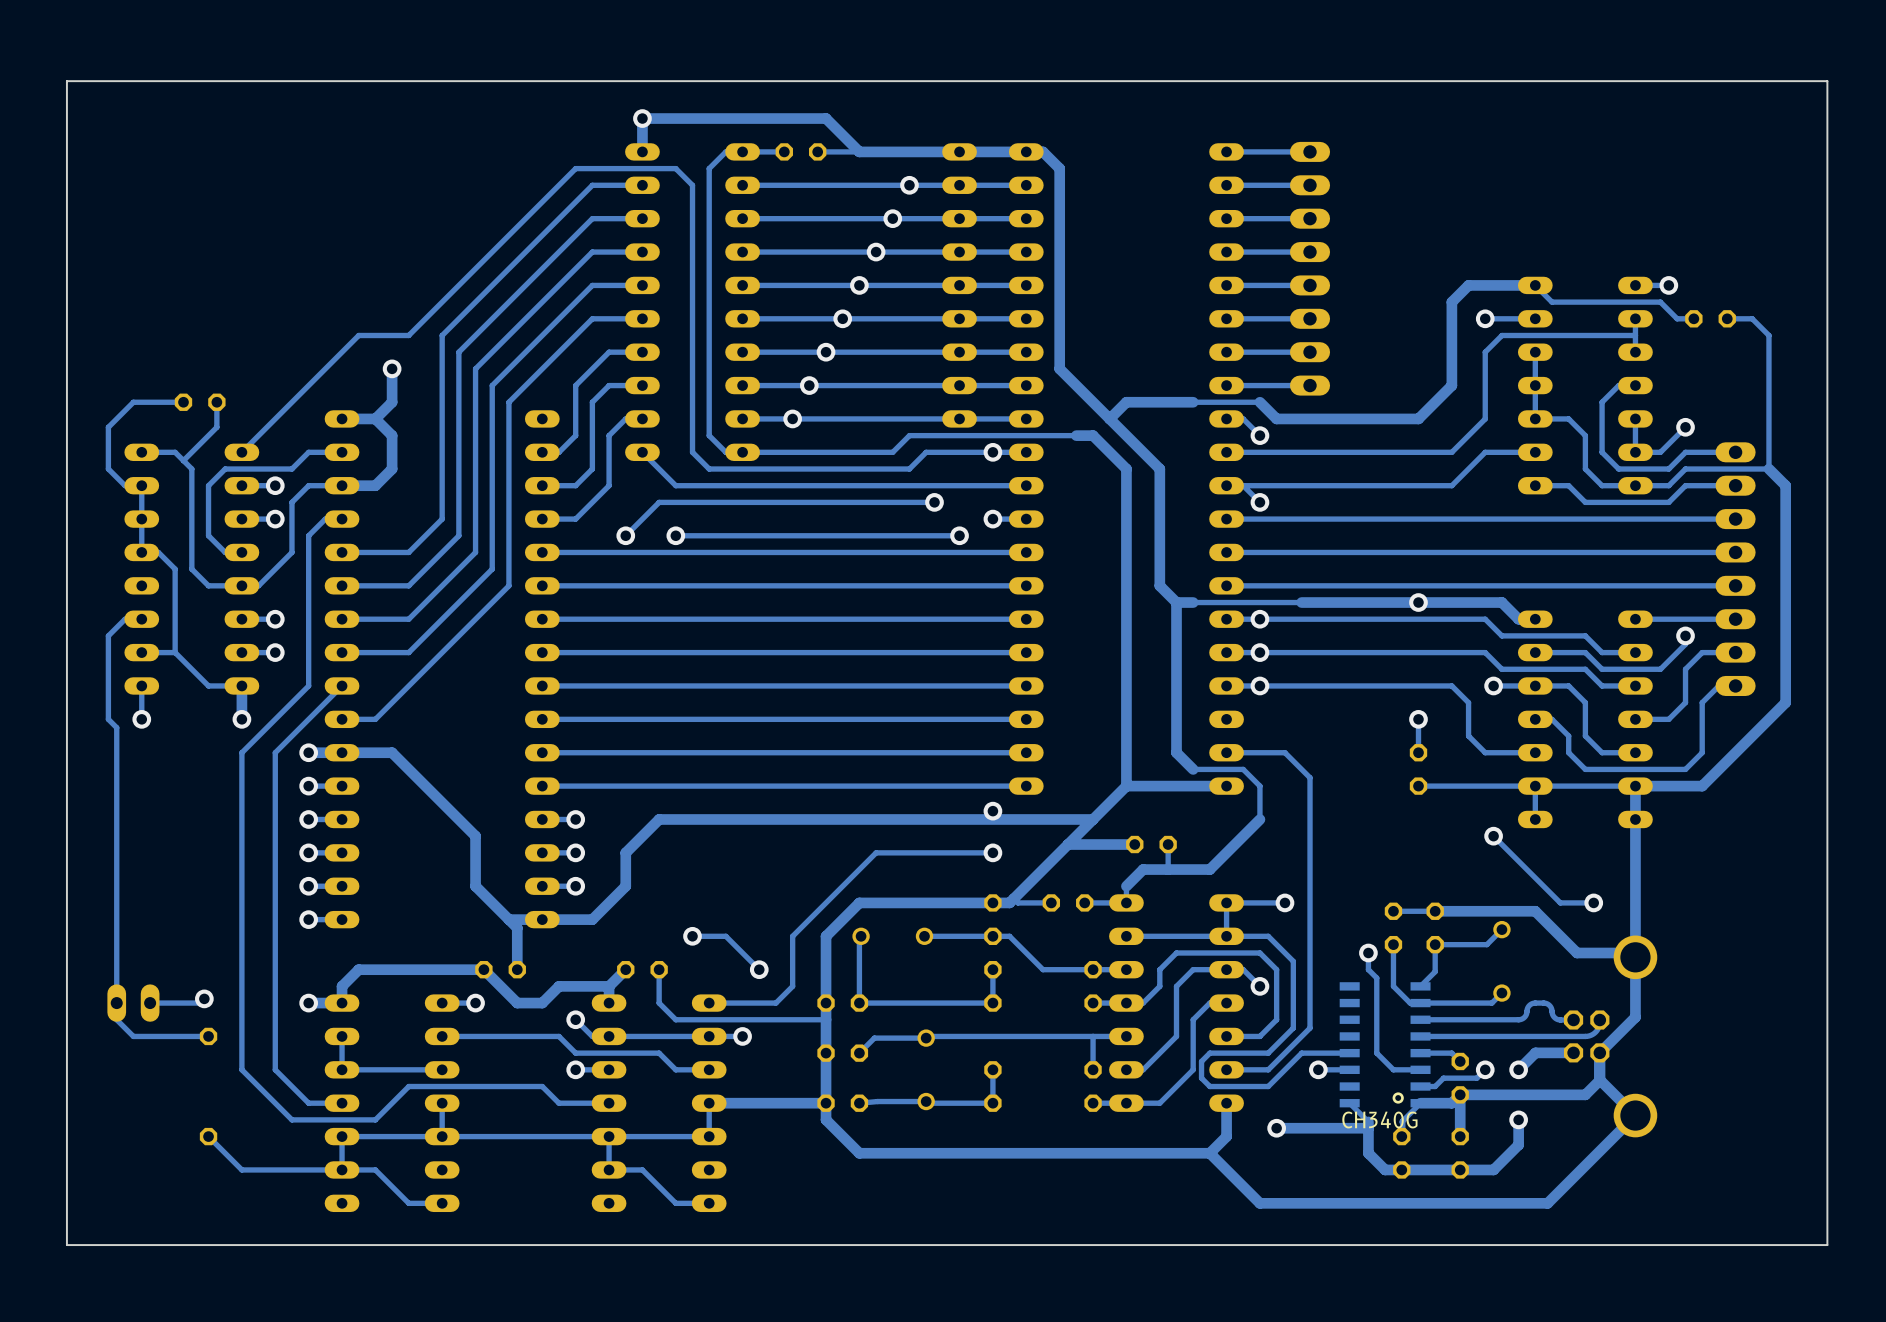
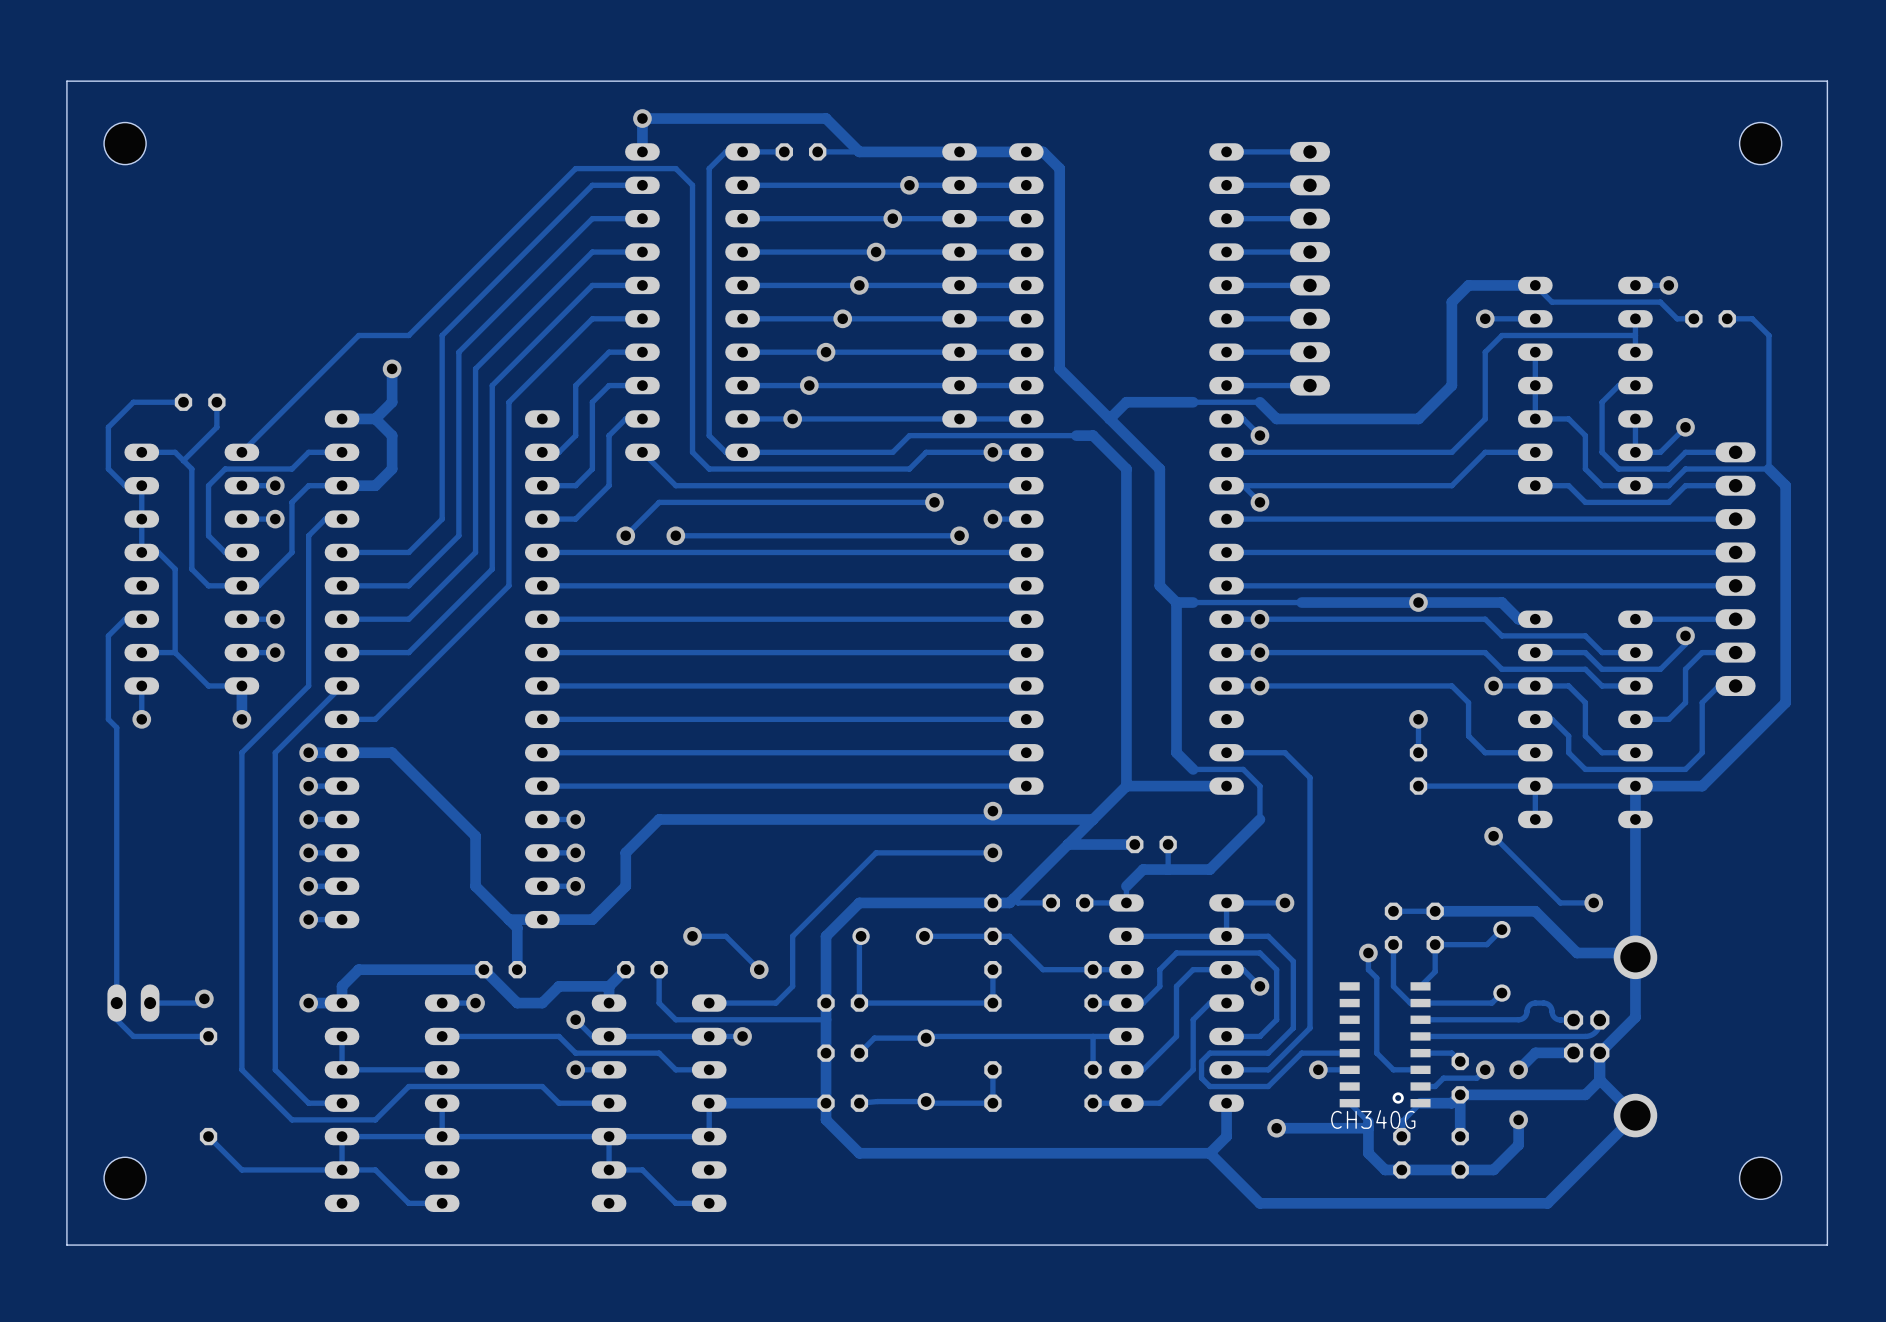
hole: none -> (125, 143)
hole: none -> (1760, 143)
hole: none -> (125, 1178)
hole: none -> (1760, 1178)

